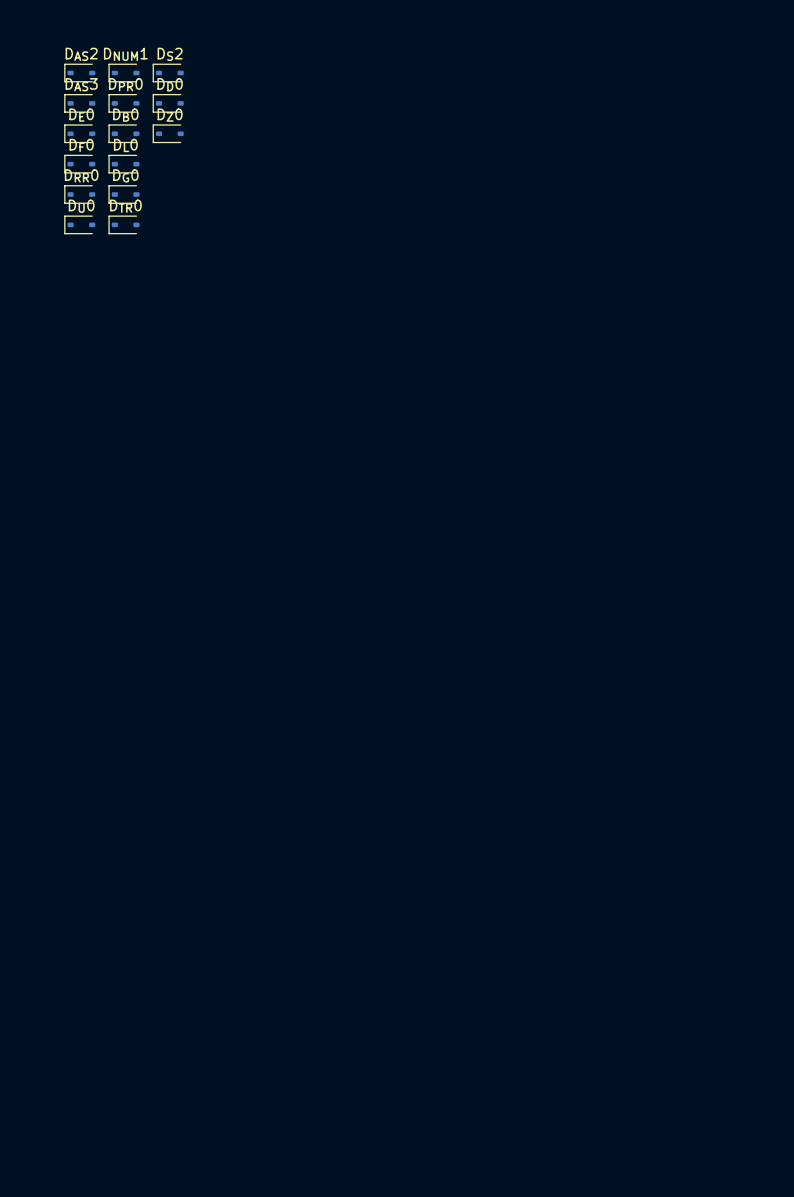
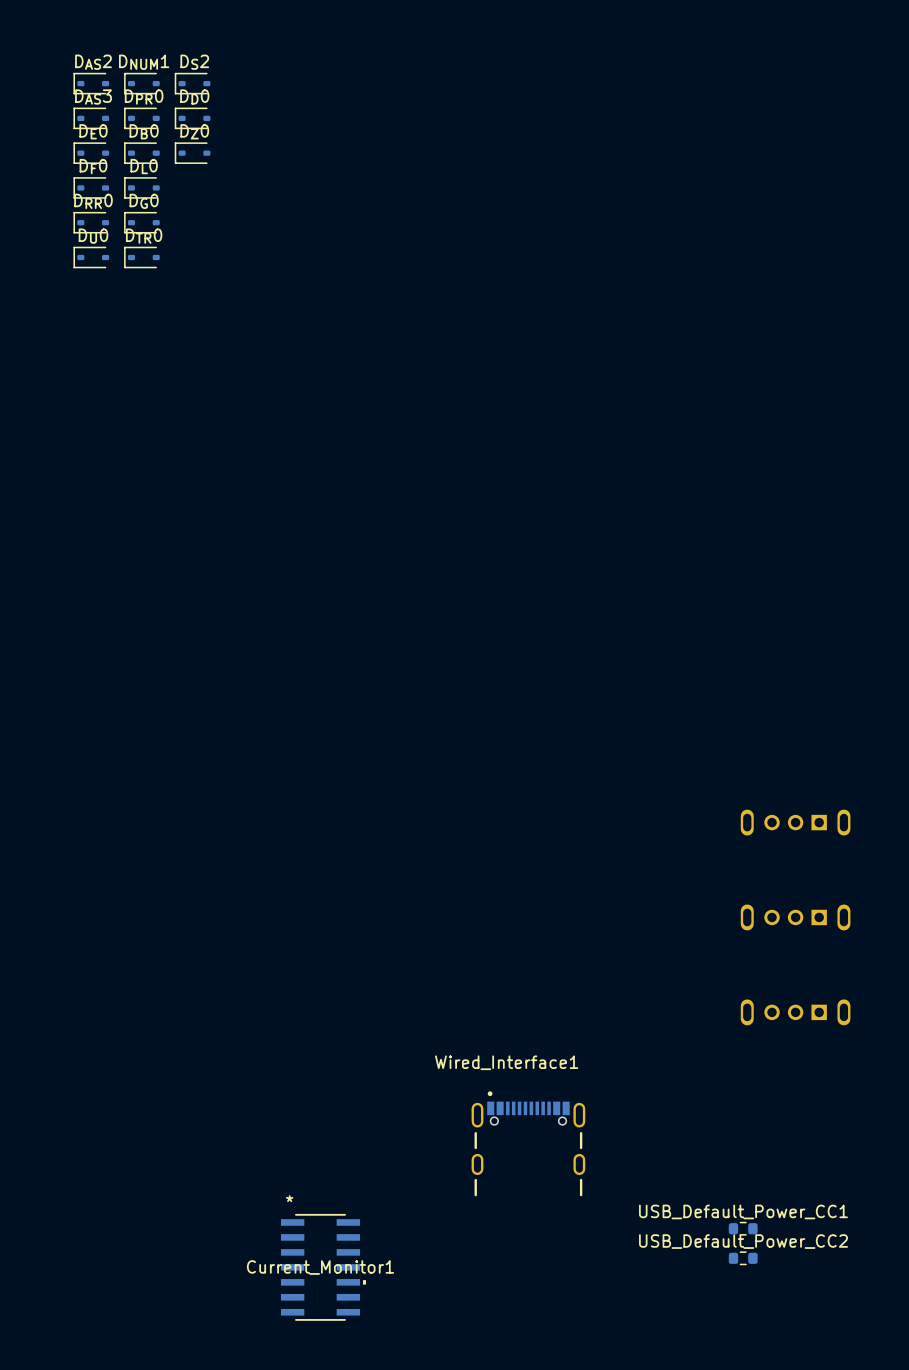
part: none -> (795, 822)
part: none -> (795, 917)
part: none -> (795, 1012)
Wired_Interface1: none -> (528, 1143)
USB_Default_Power_CC1: none -> (743, 1228)
USB_Default_Power_CC2: none -> (743, 1258)
Current_Monitor1: none -> (323, 1267)

